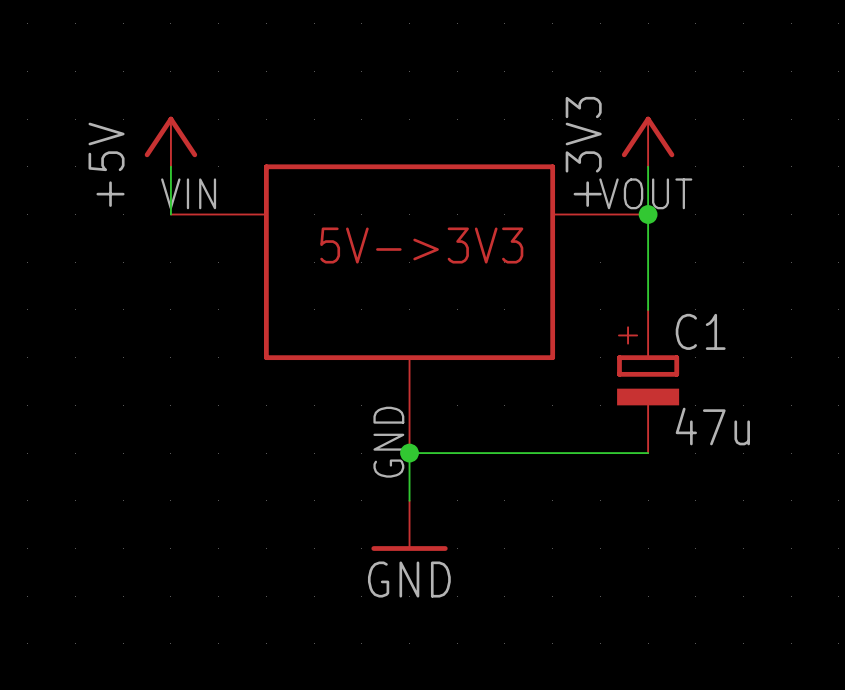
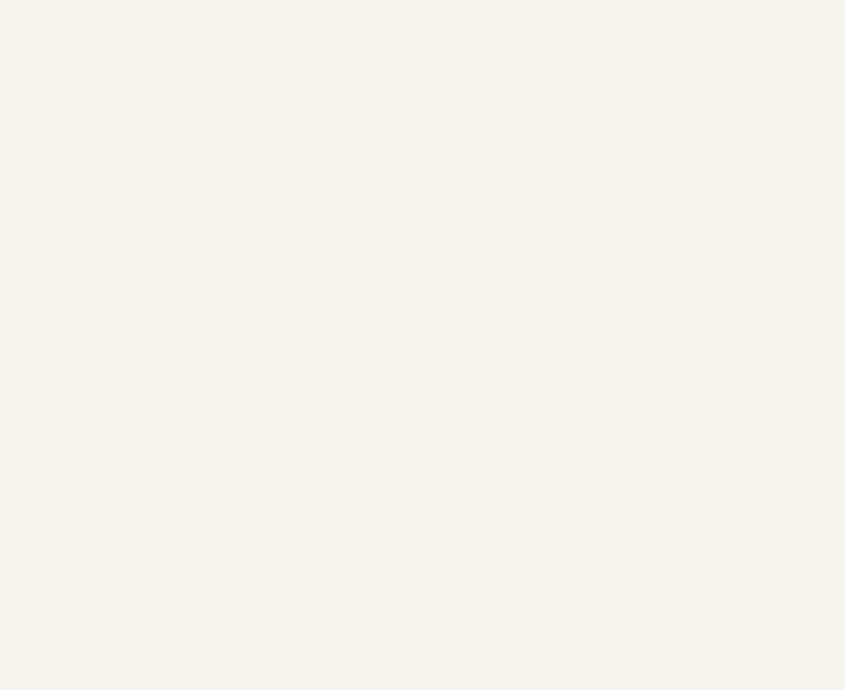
power symbol: +5V (170, 141) -> none
power symbol: +3V3 (648, 141) -> none
wire: (170, 166) (170, 214) -> none
wire: (648, 166) (648, 309) -> none
junction: (648, 214) -> none
part: (409, 308) -> none
C1: 47u (648, 381) -> none
junction: (409, 453) -> none
wire: (648, 453) (409, 453) (409, 500) -> none
power symbol: GND (409, 525) -> none

